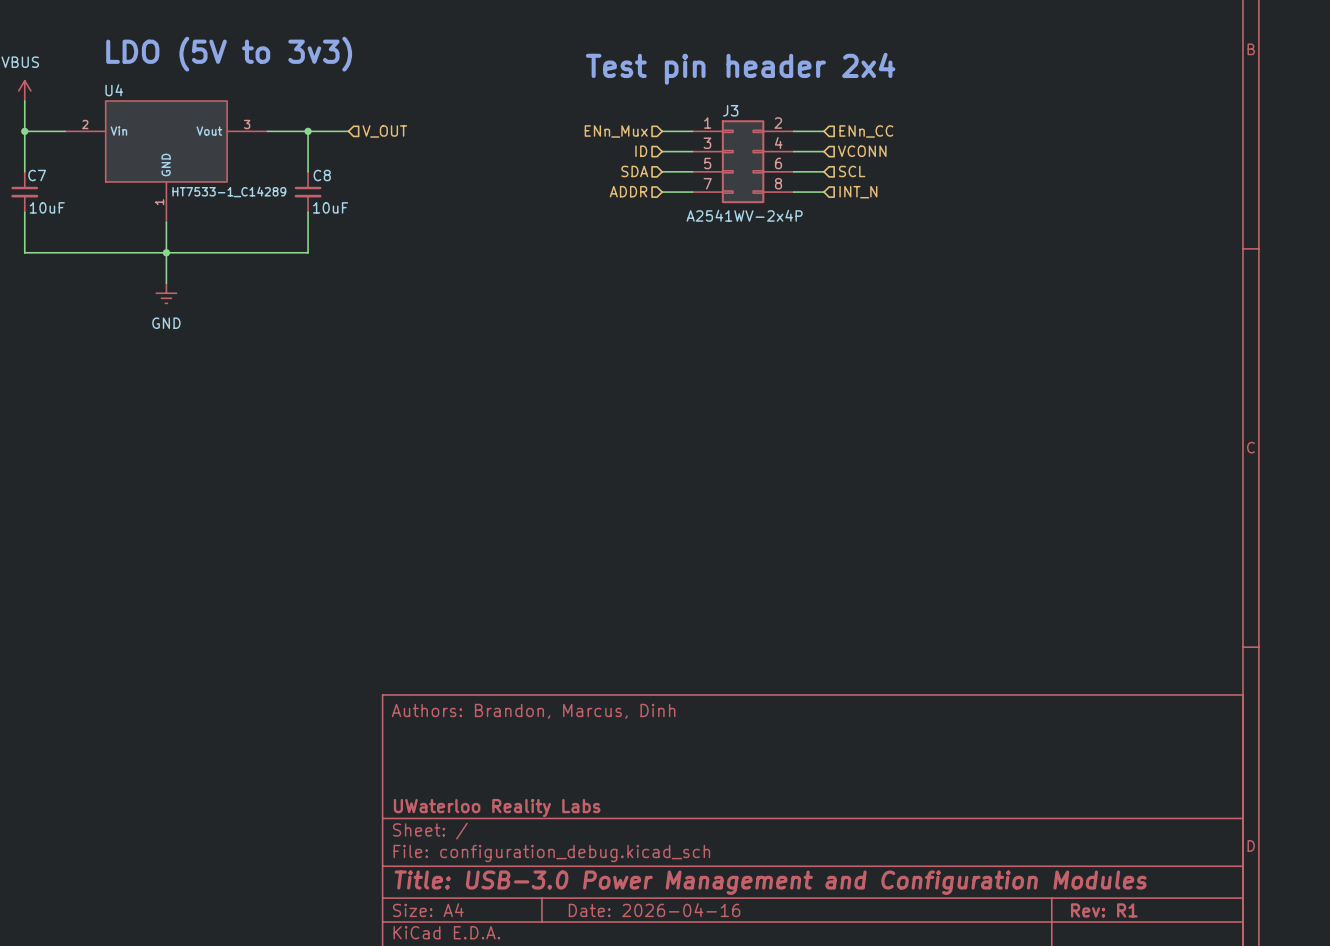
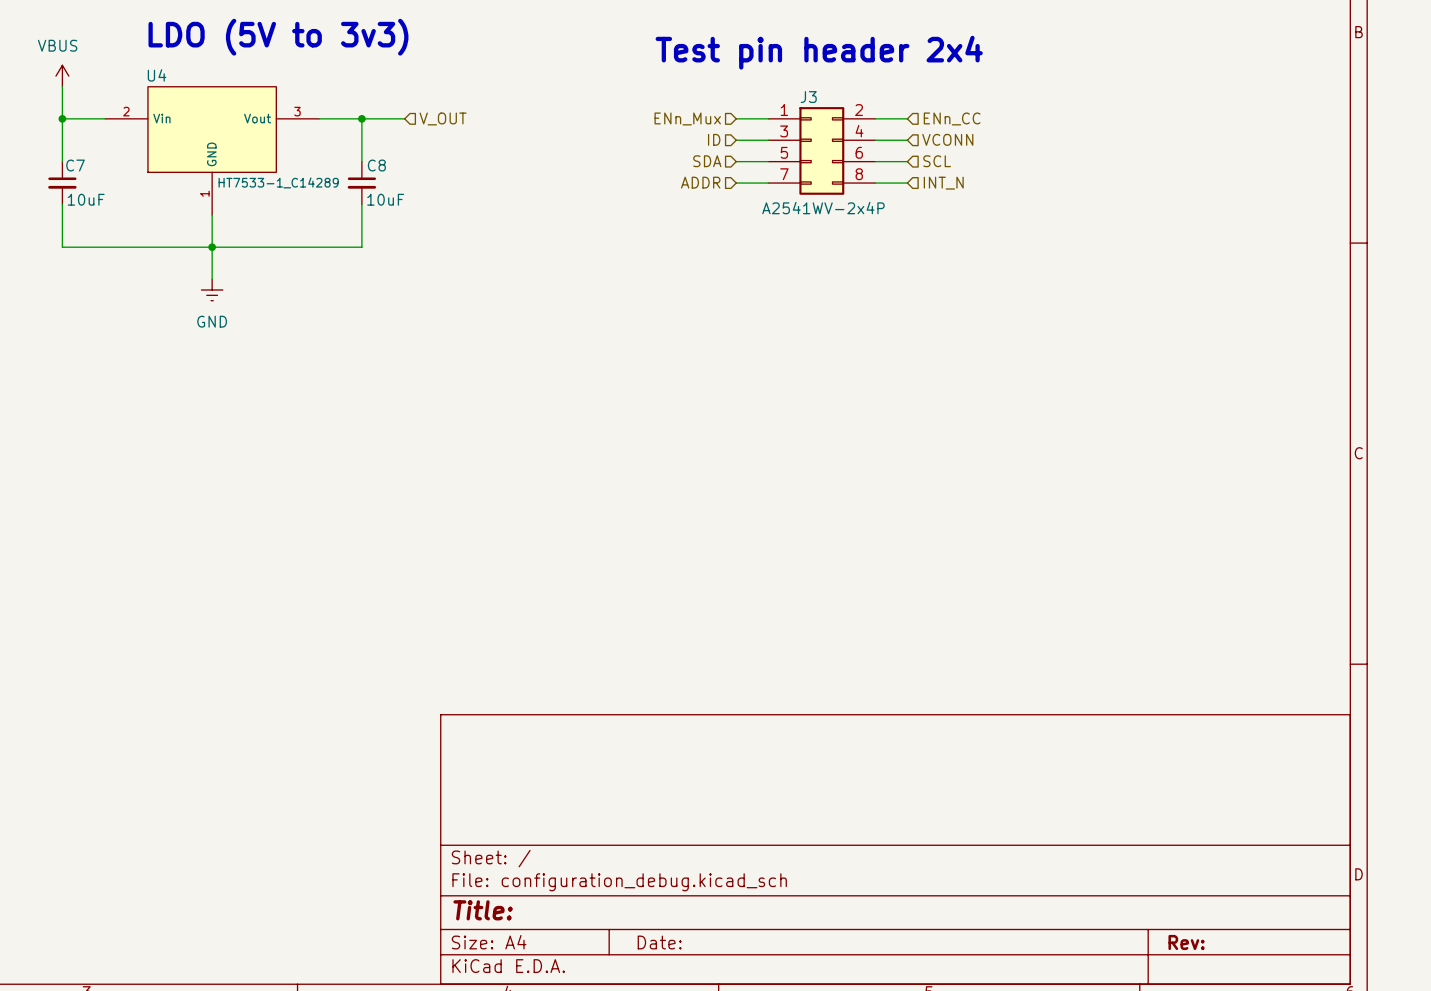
title block: Authors: Brandon, Marcus, Dinh (533, 711) -> none
title block: UWaterloo Reality Labs (497, 808) -> none
title block: Title: USB-3.0 Power Management and Configuration Modules (770, 882) -> Title: (483, 910)
title block: Date: 2026-04-16 (654, 910) -> Date: (659, 942)
title block: Rev: R1 (1104, 910) -> Rev: (1186, 942)

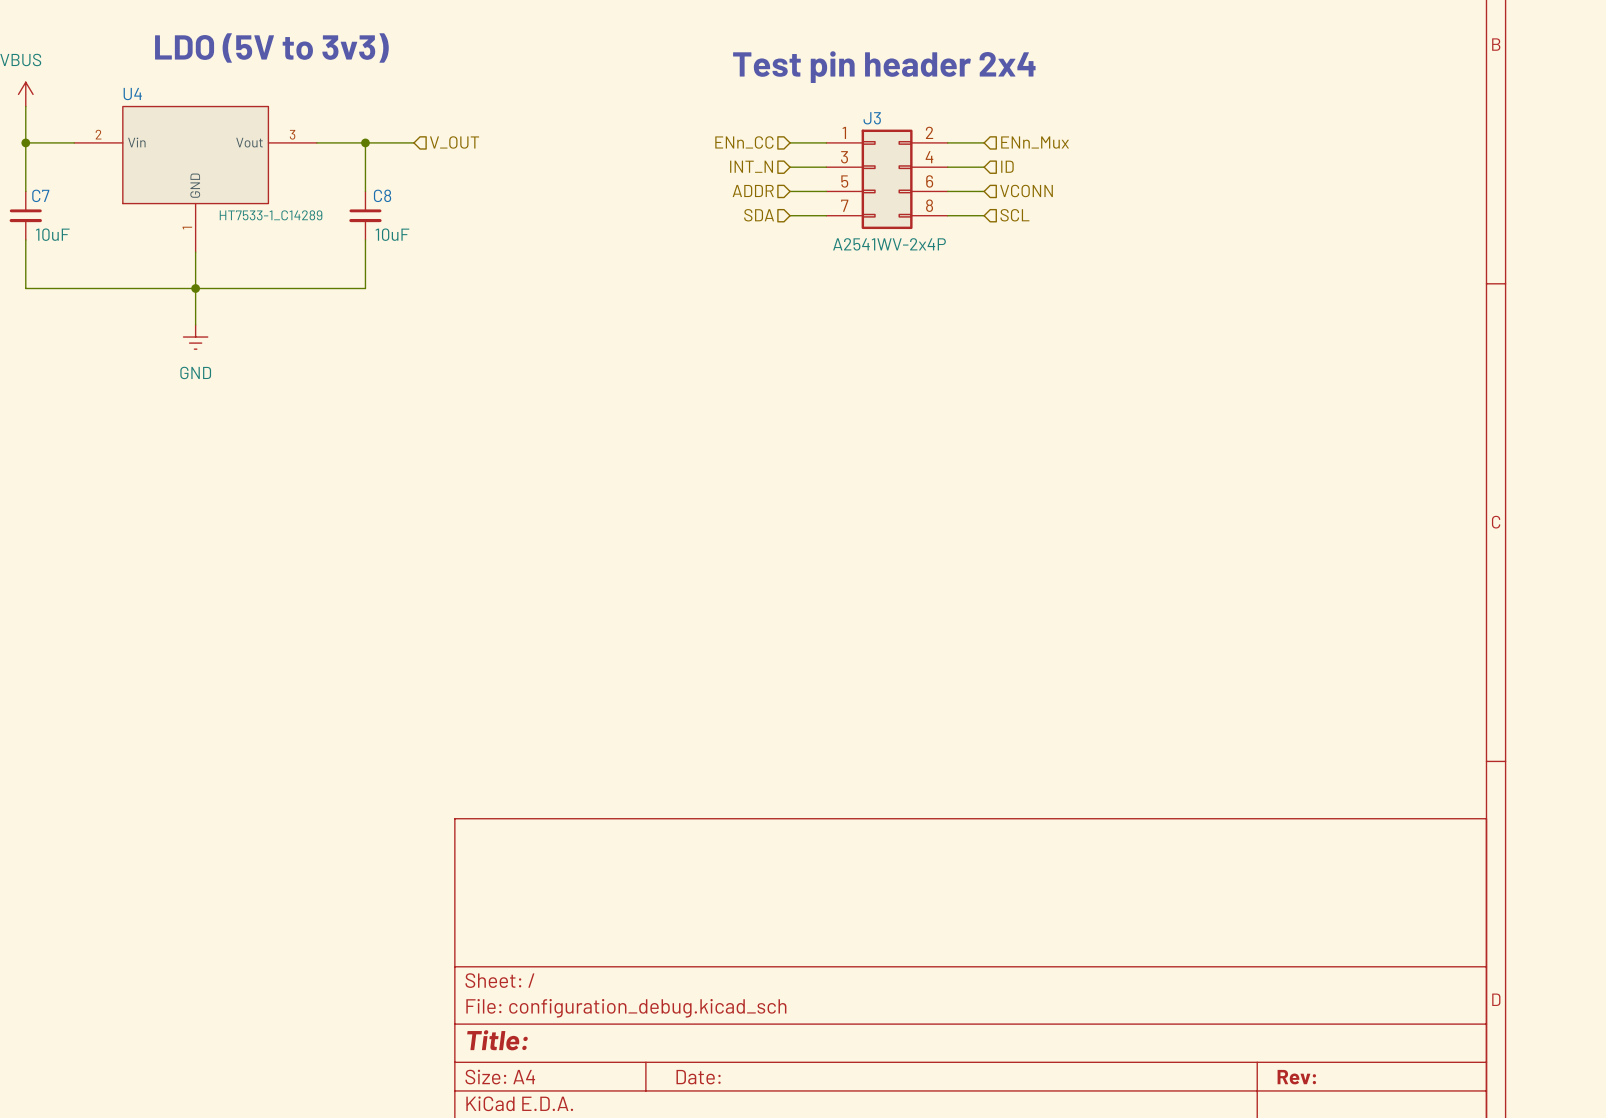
hierarchical label: ENn_Mux (687, 118) -> ENn_CC (744, 142)
hierarchical label: ENn_CC (952, 118) -> ENn_Mux (1035, 142)
hierarchical label: ID (714, 139) -> INT_N (751, 166)
hierarchical label: VCONN (947, 139) -> ID (1007, 166)
hierarchical label: SDA (707, 161) -> ADDR (753, 190)
hierarchical label: SCL (937, 161) -> VCONN (1026, 191)
hierarchical label: ADDR (700, 182) -> SDA (759, 215)
hierarchical label: INT_N (943, 183) -> SCL (1014, 215)

